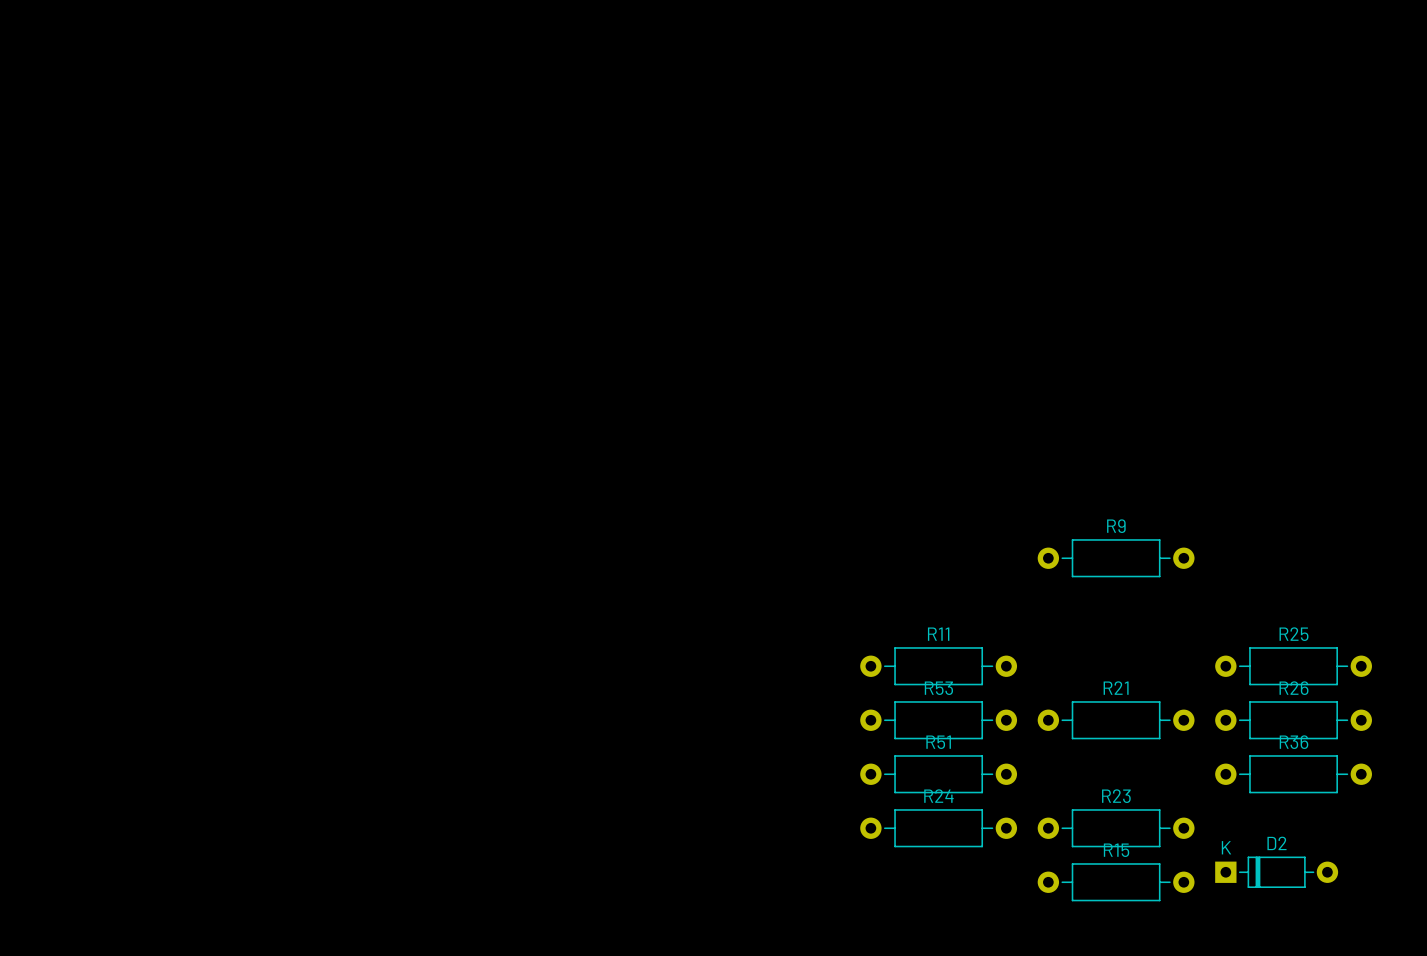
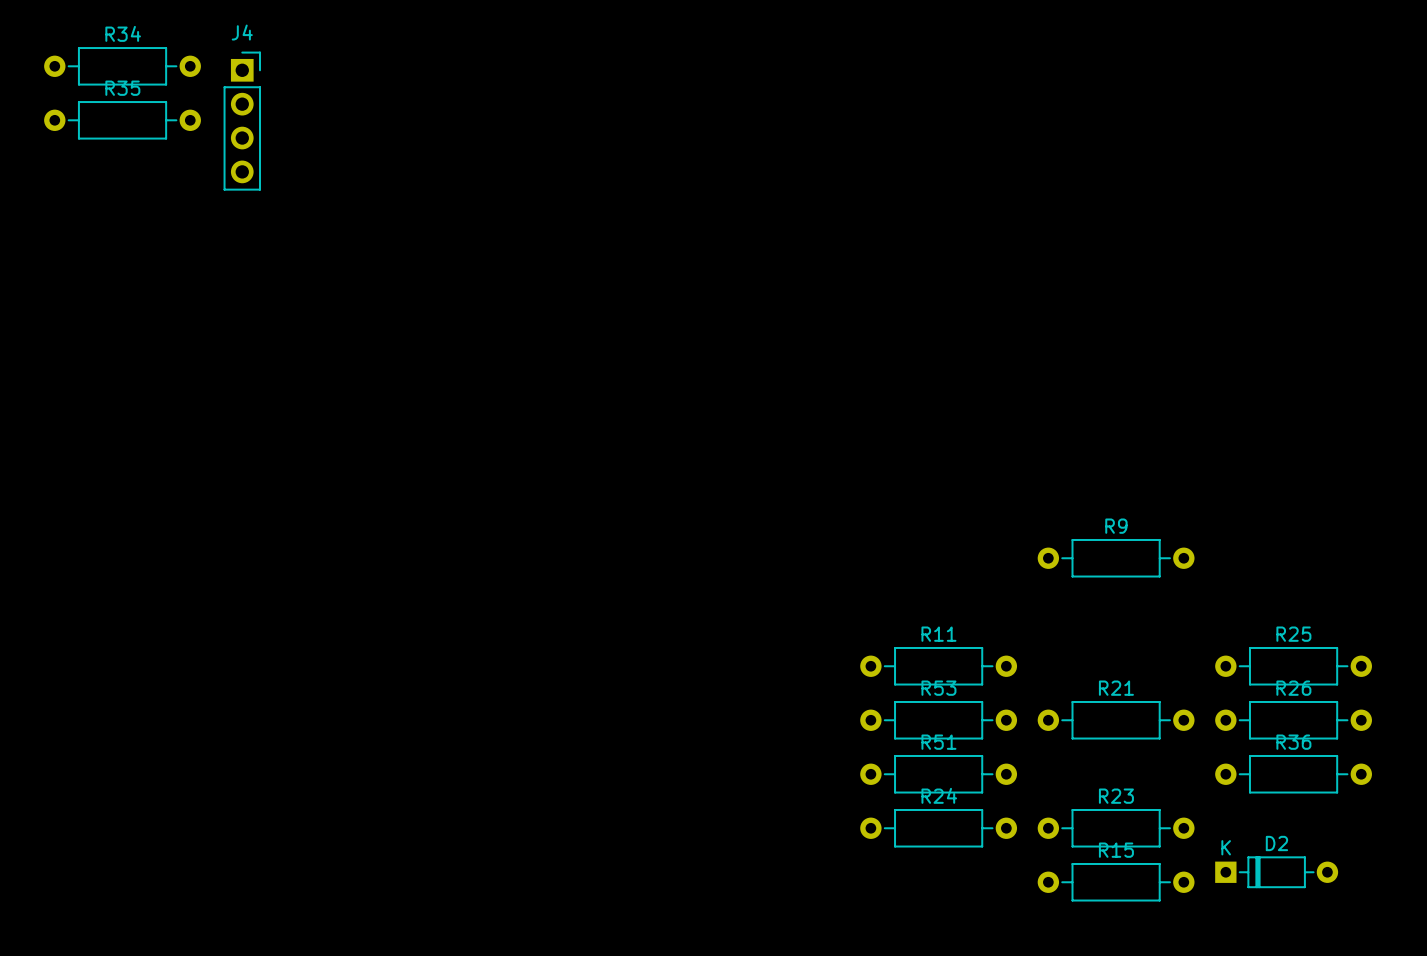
R34: none -> (122, 66)
R35: none -> (122, 120)
J4: none -> (242, 121)

